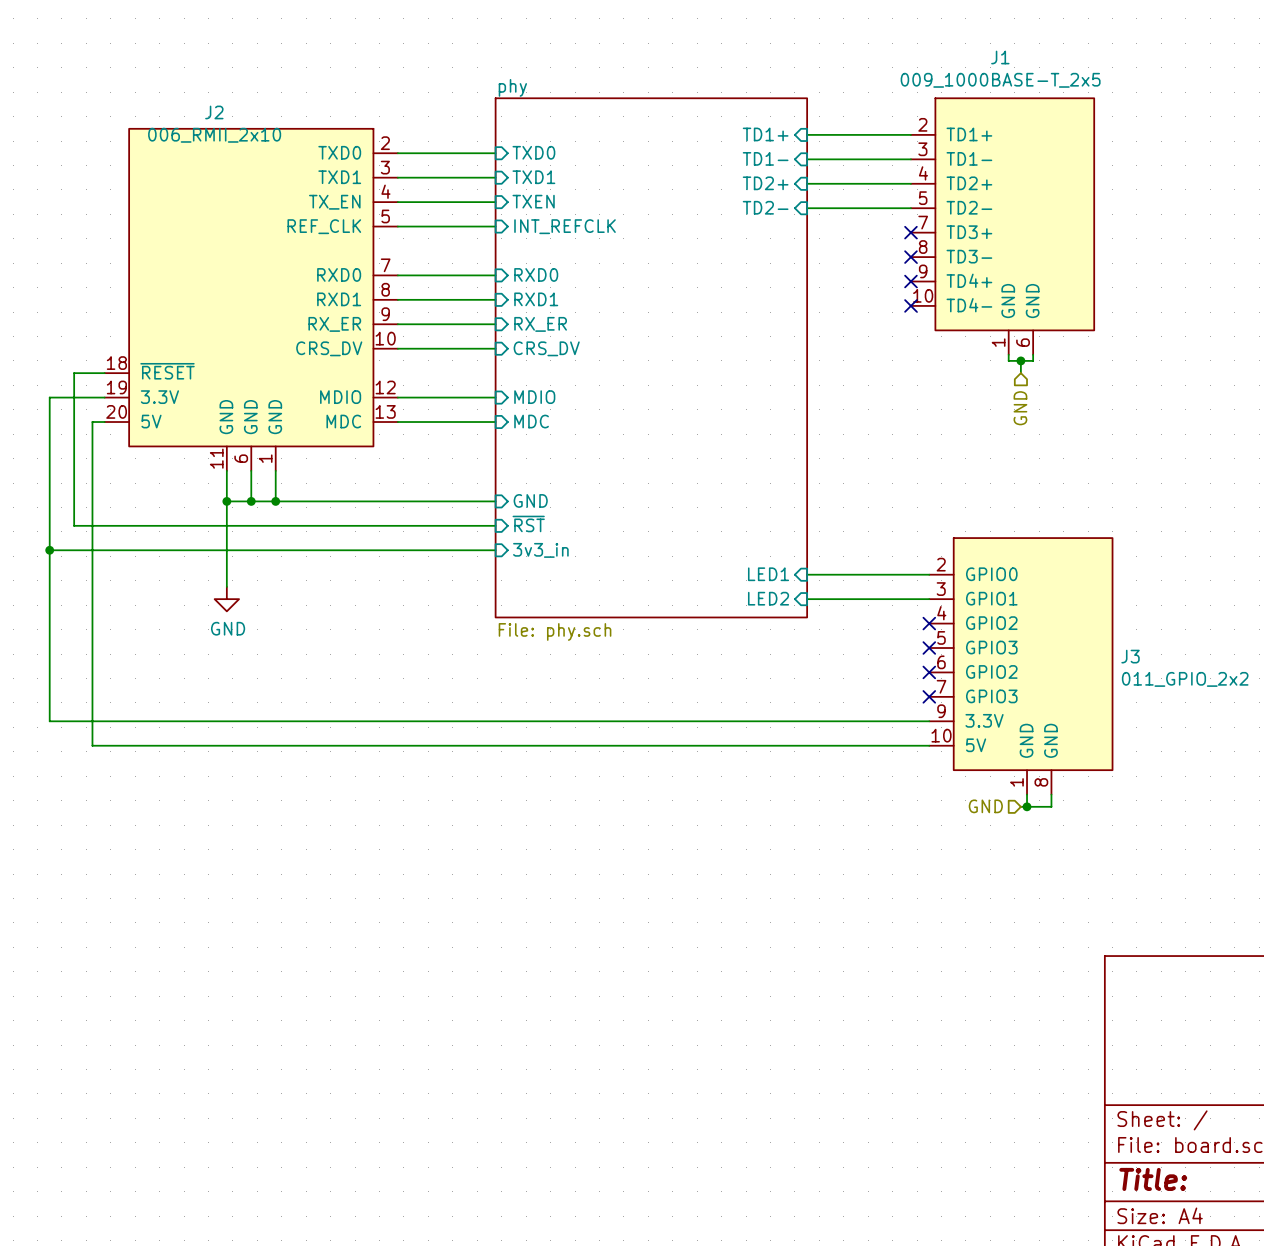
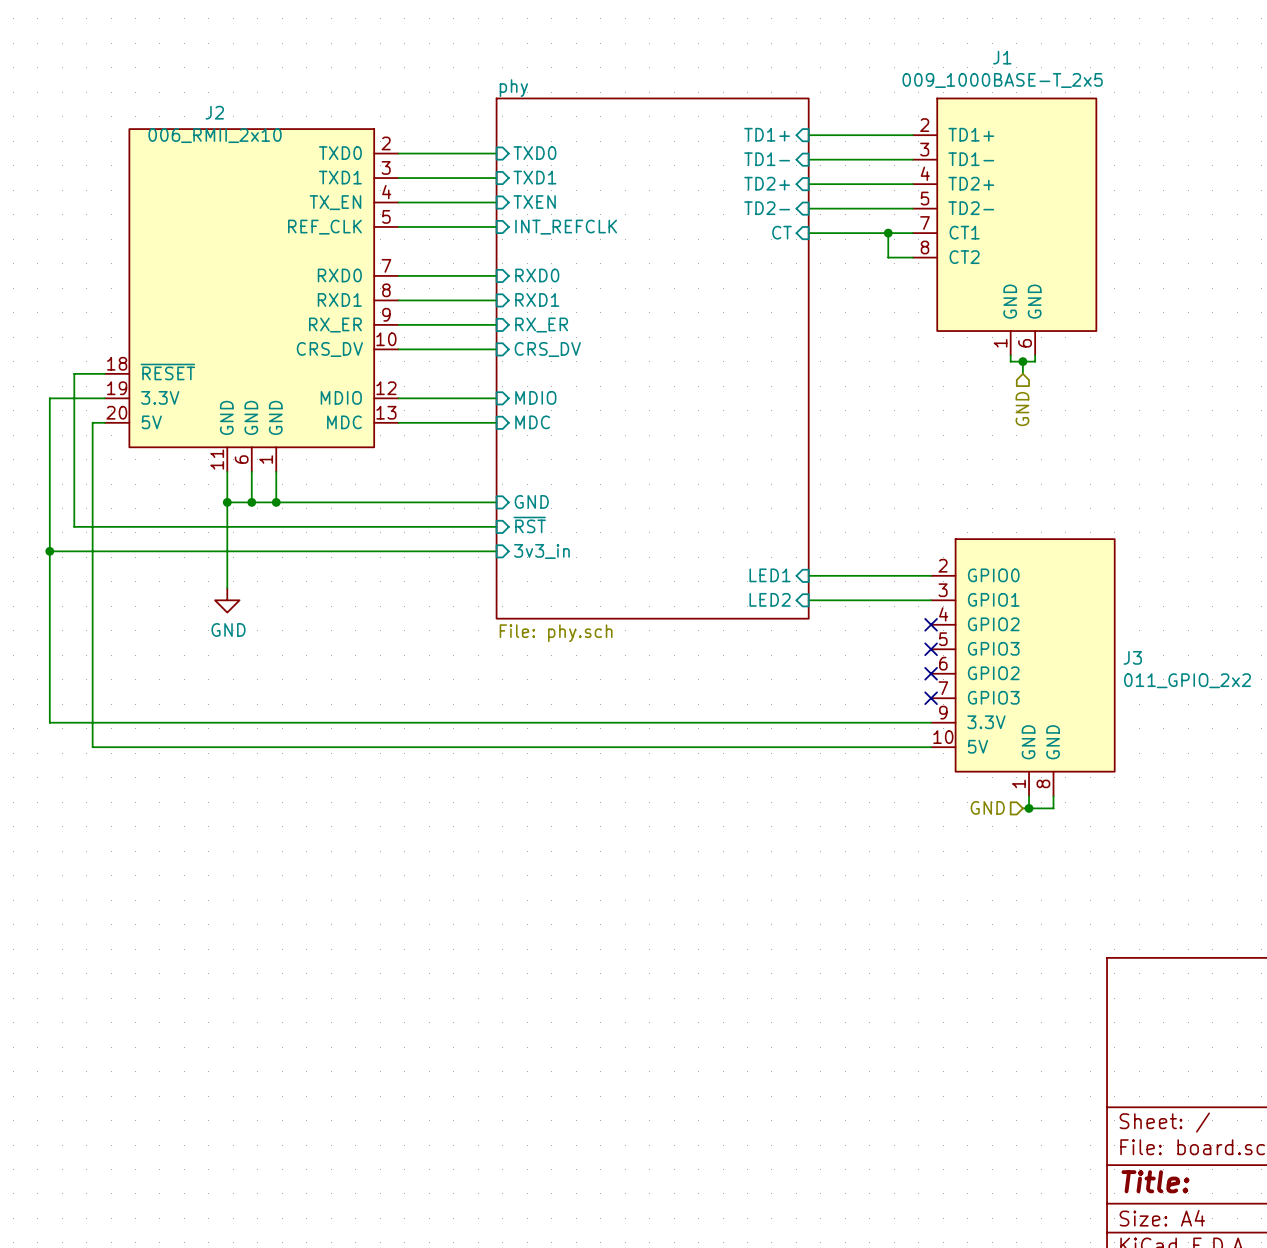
J1 symbol: [910, 98, 1095, 355] -> [912, 98, 1097, 356]
sheet pin: none -> CT (781, 232)
wire: none -> (808, 233) (912, 233)
wire: none -> (888, 233) (888, 257) (912, 257)
junction: none -> (888, 233)
no-connect mark: (910, 232) -> none
no-connect mark: (910, 257) -> none
no-connect mark: (910, 281) -> none
no-connect mark: (910, 305) -> none

